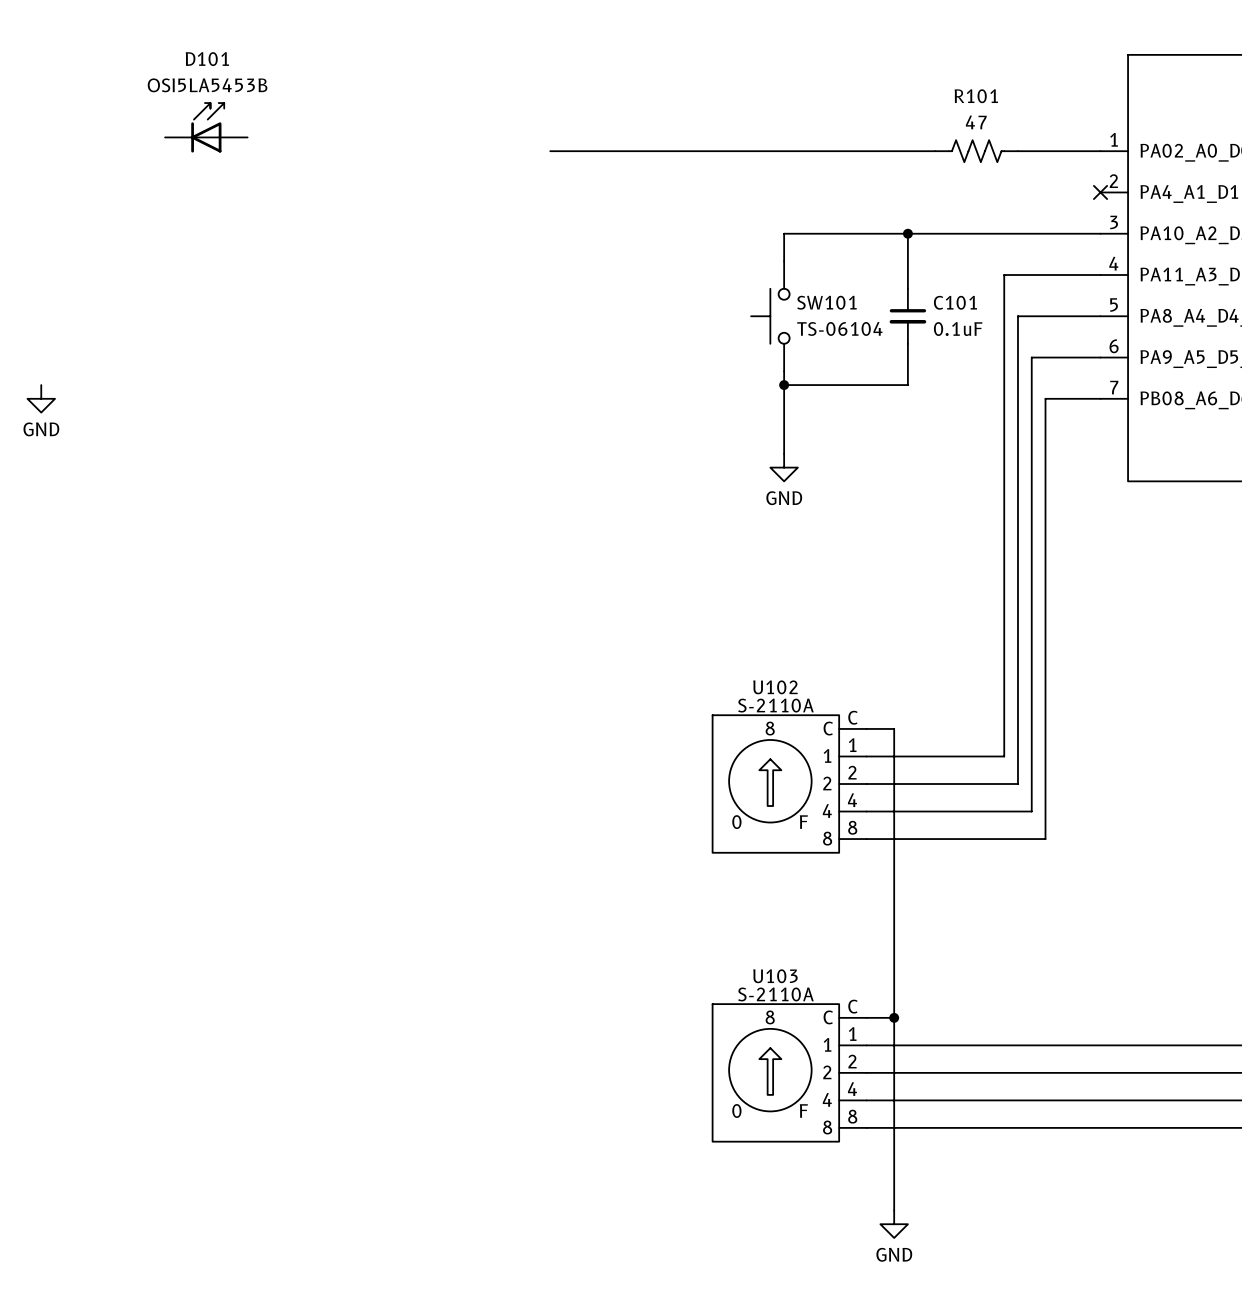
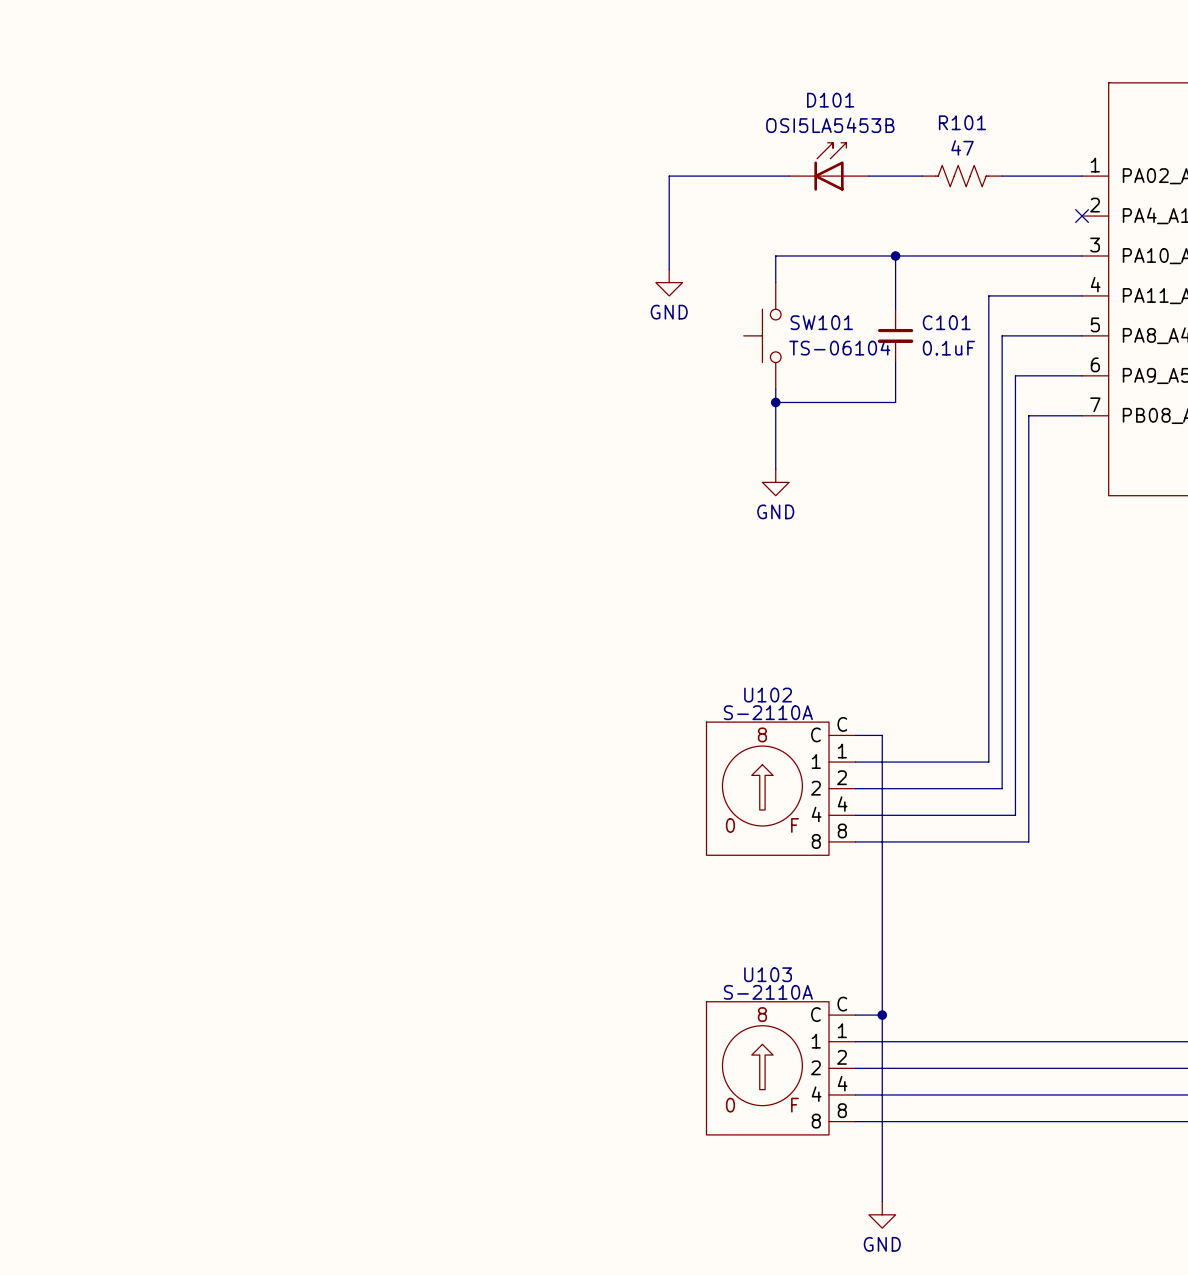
D101 position: (206, 127) -> (829, 166)
wire: (550, 151) (674, 151) -> (669, 269) (669, 176)
power symbol: none -> GND (669, 282)
power symbol: GND (41, 398) -> none

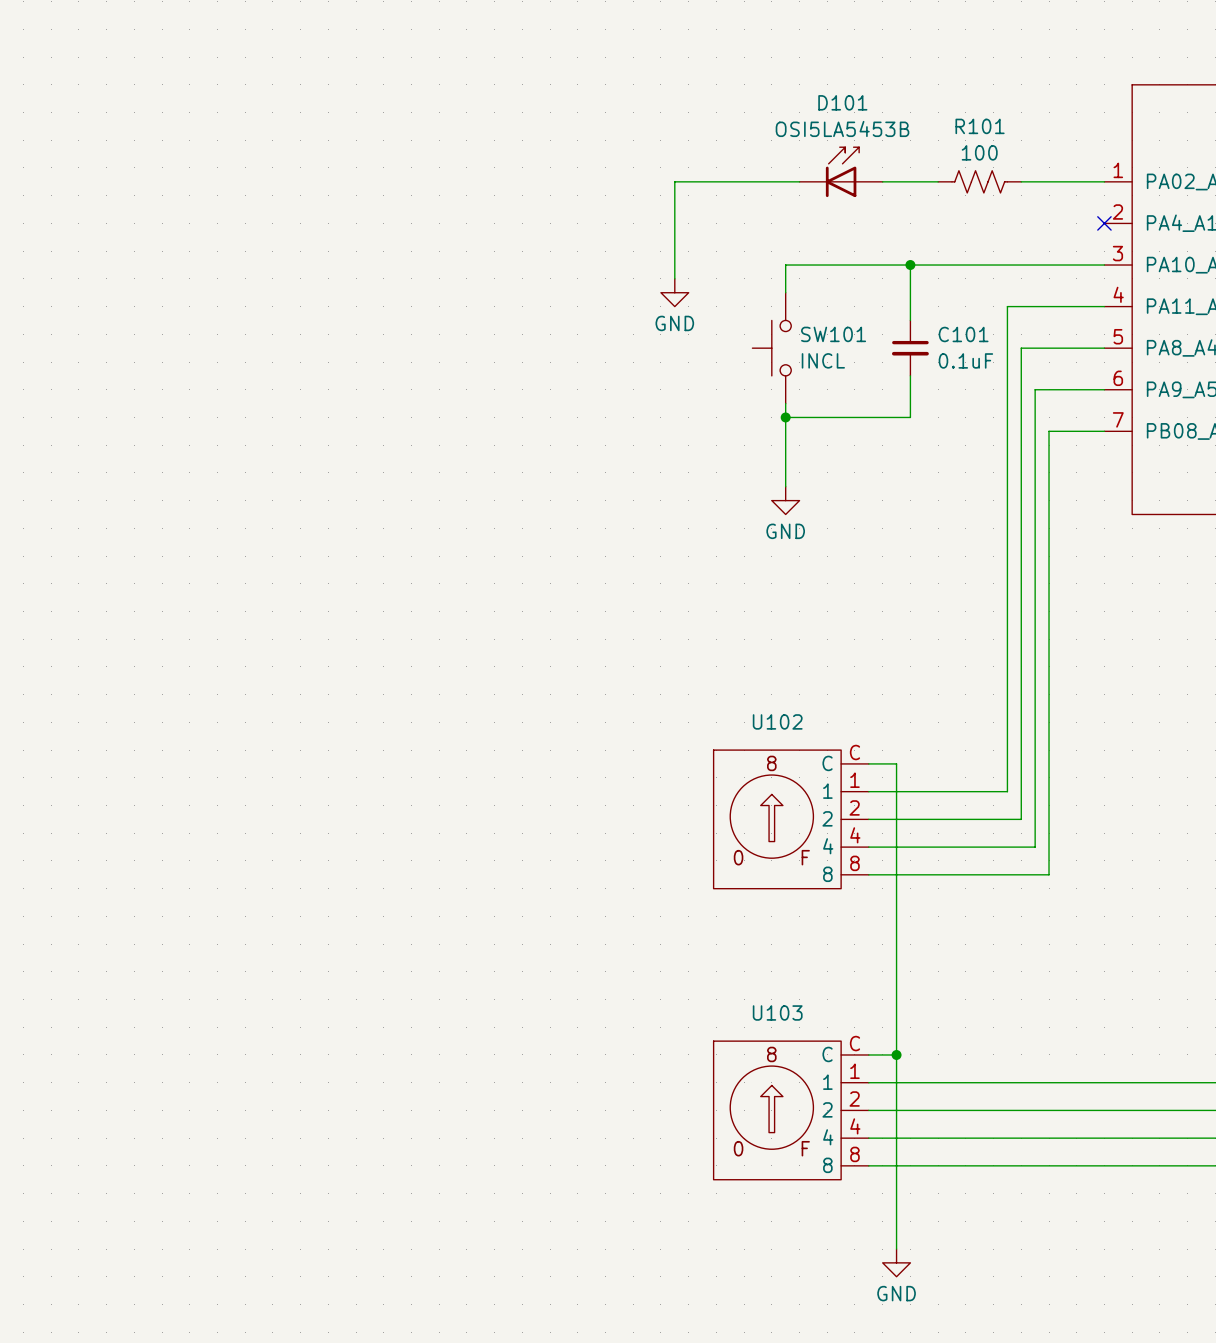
R101 value: 47 (962, 147) -> 100 (979, 152)
SW101 value: TS-06104 (839, 347) -> INCL (823, 360)
U102 value: S-2110A (768, 712) -> none
U103 value: S-2110A (768, 992) -> none

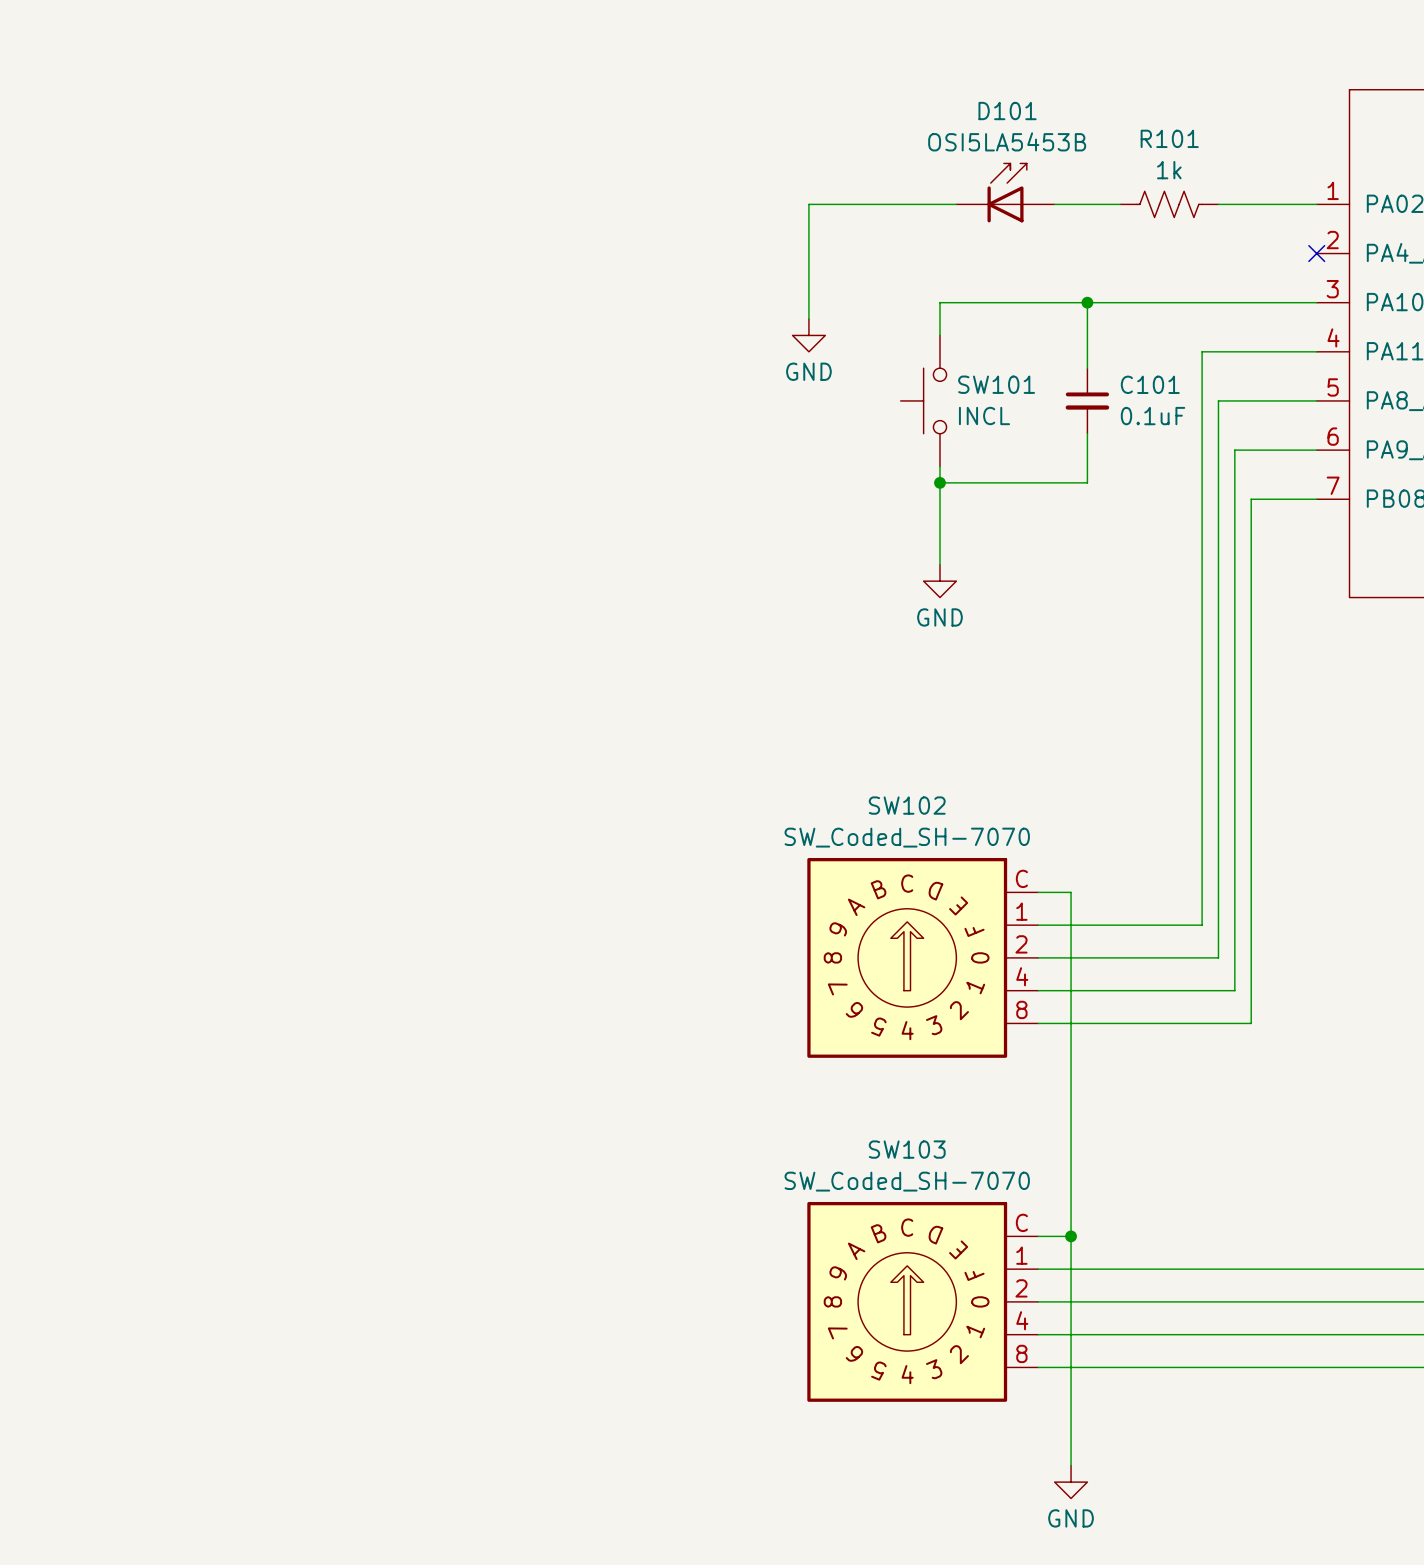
R101 value: 100 (979, 152) -> 1k (1169, 170)
SW102: none -> SW_Coded_SH-7070 (922, 957)
U102: (791, 819) -> none
SW103: none -> SW_Coded_SH-7070 (922, 1301)
U103: (791, 1110) -> none

